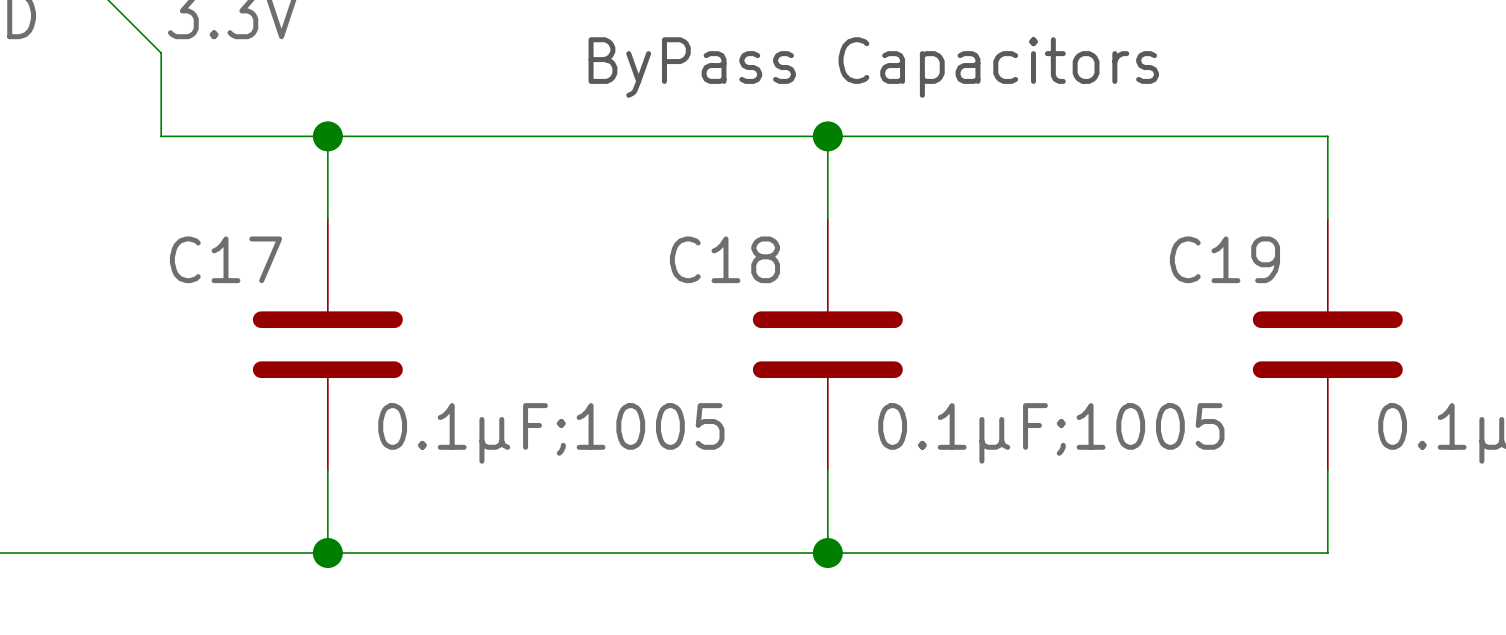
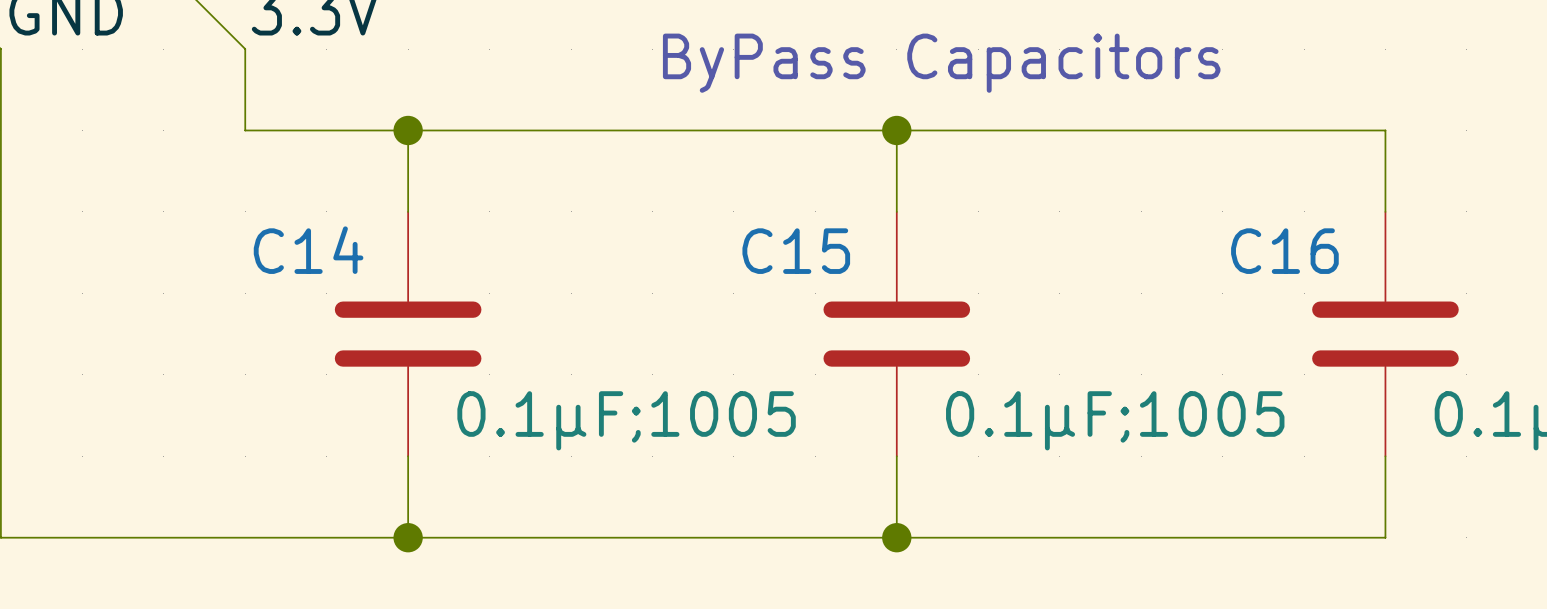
C17 name: C17 (225, 259) -> C14 (308, 250)
C18 name: C18 (724, 259) -> C15 (796, 251)
C19 name: C19 (1224, 259) -> C16 (1284, 251)

